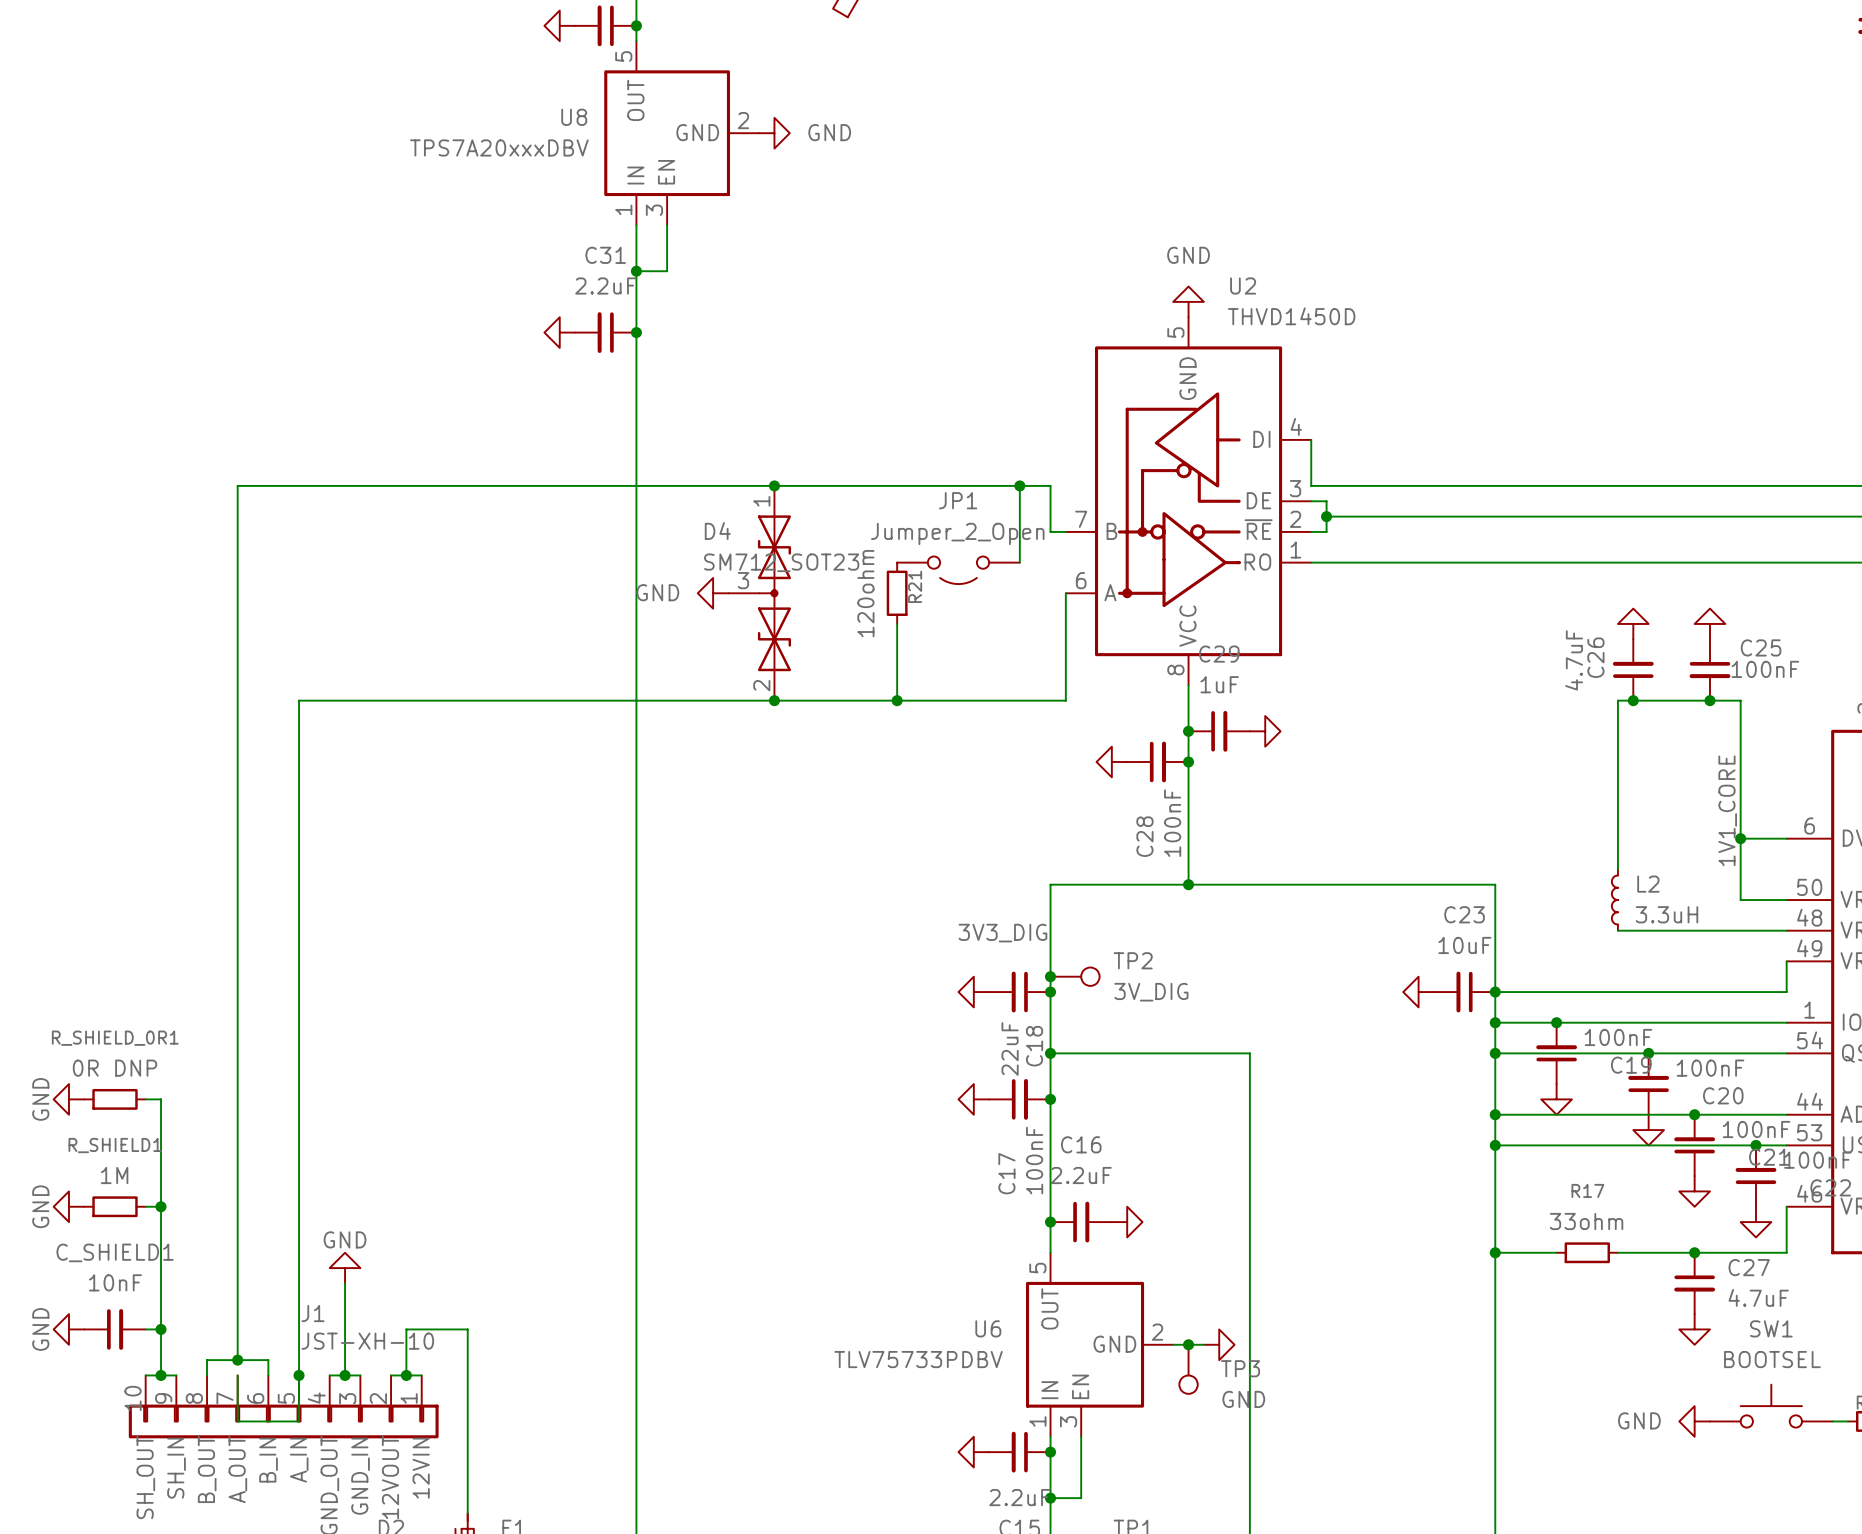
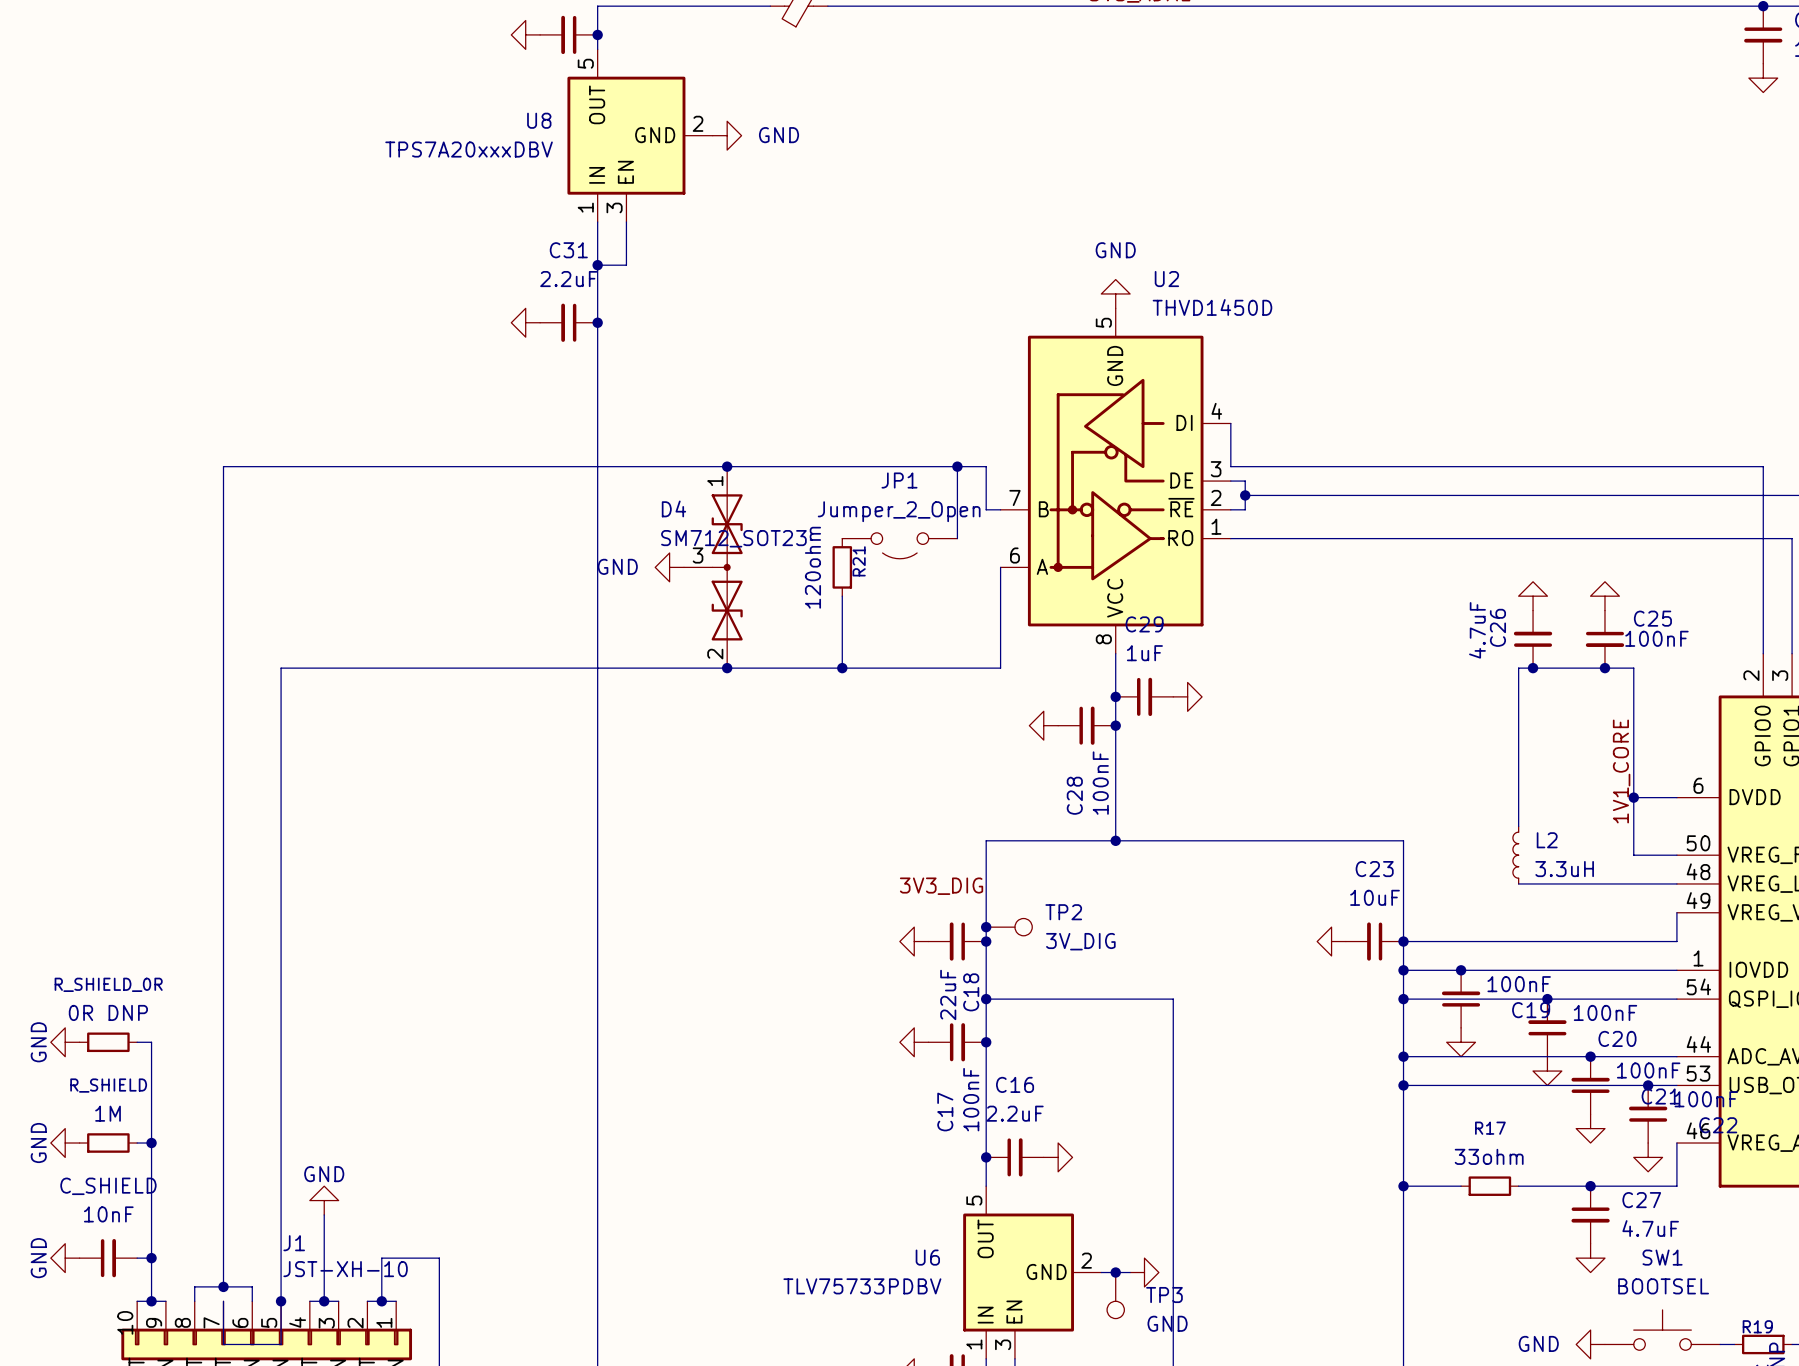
R_SHIELD_0R1 name: R_SHIELD_0R1 (115, 1038) -> R_SHIELD_0R (108, 984)
R_SHIELD1 name: R_SHIELD1 (115, 1145) -> R_SHIELD (108, 1085)
C_SHIELD1 name: C_SHIELD1 (115, 1252) -> C_SHIELD (108, 1186)

